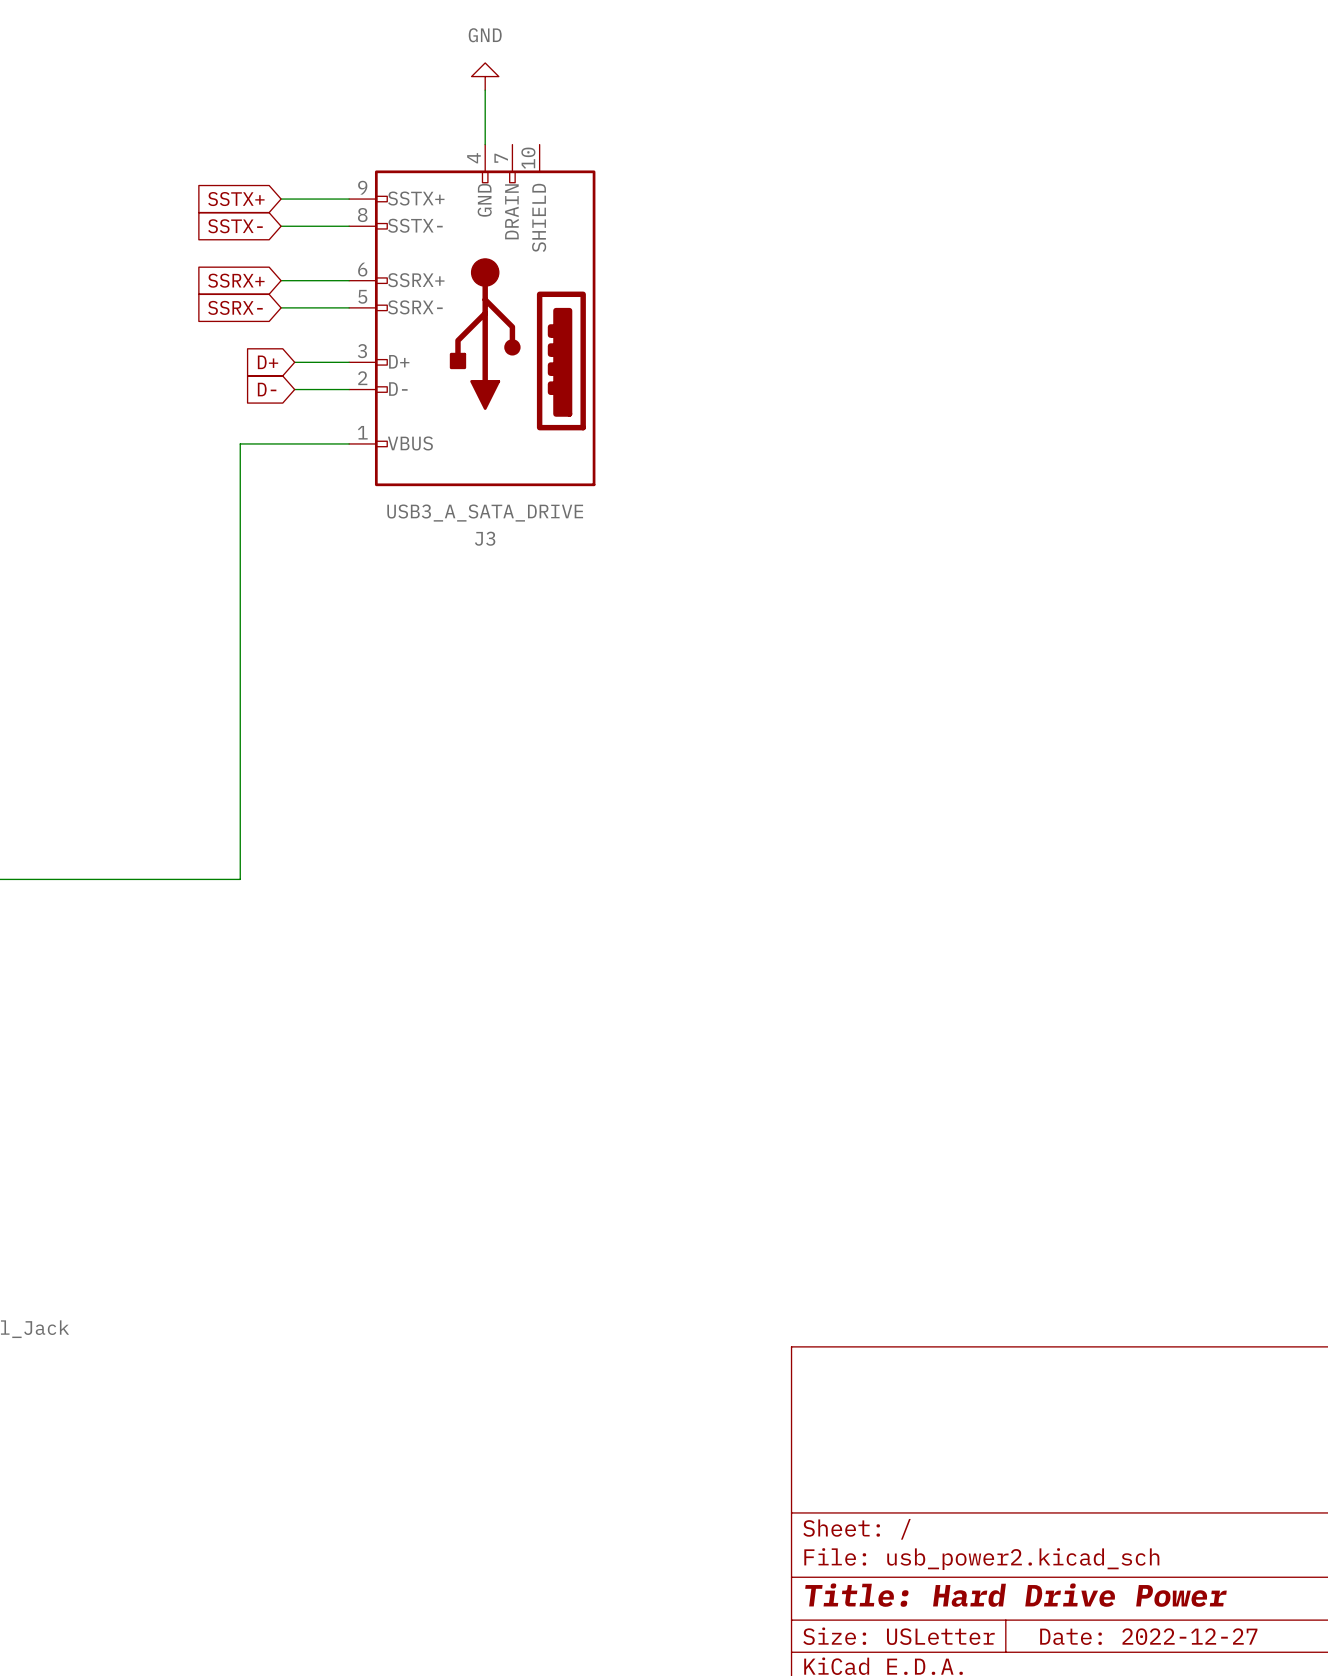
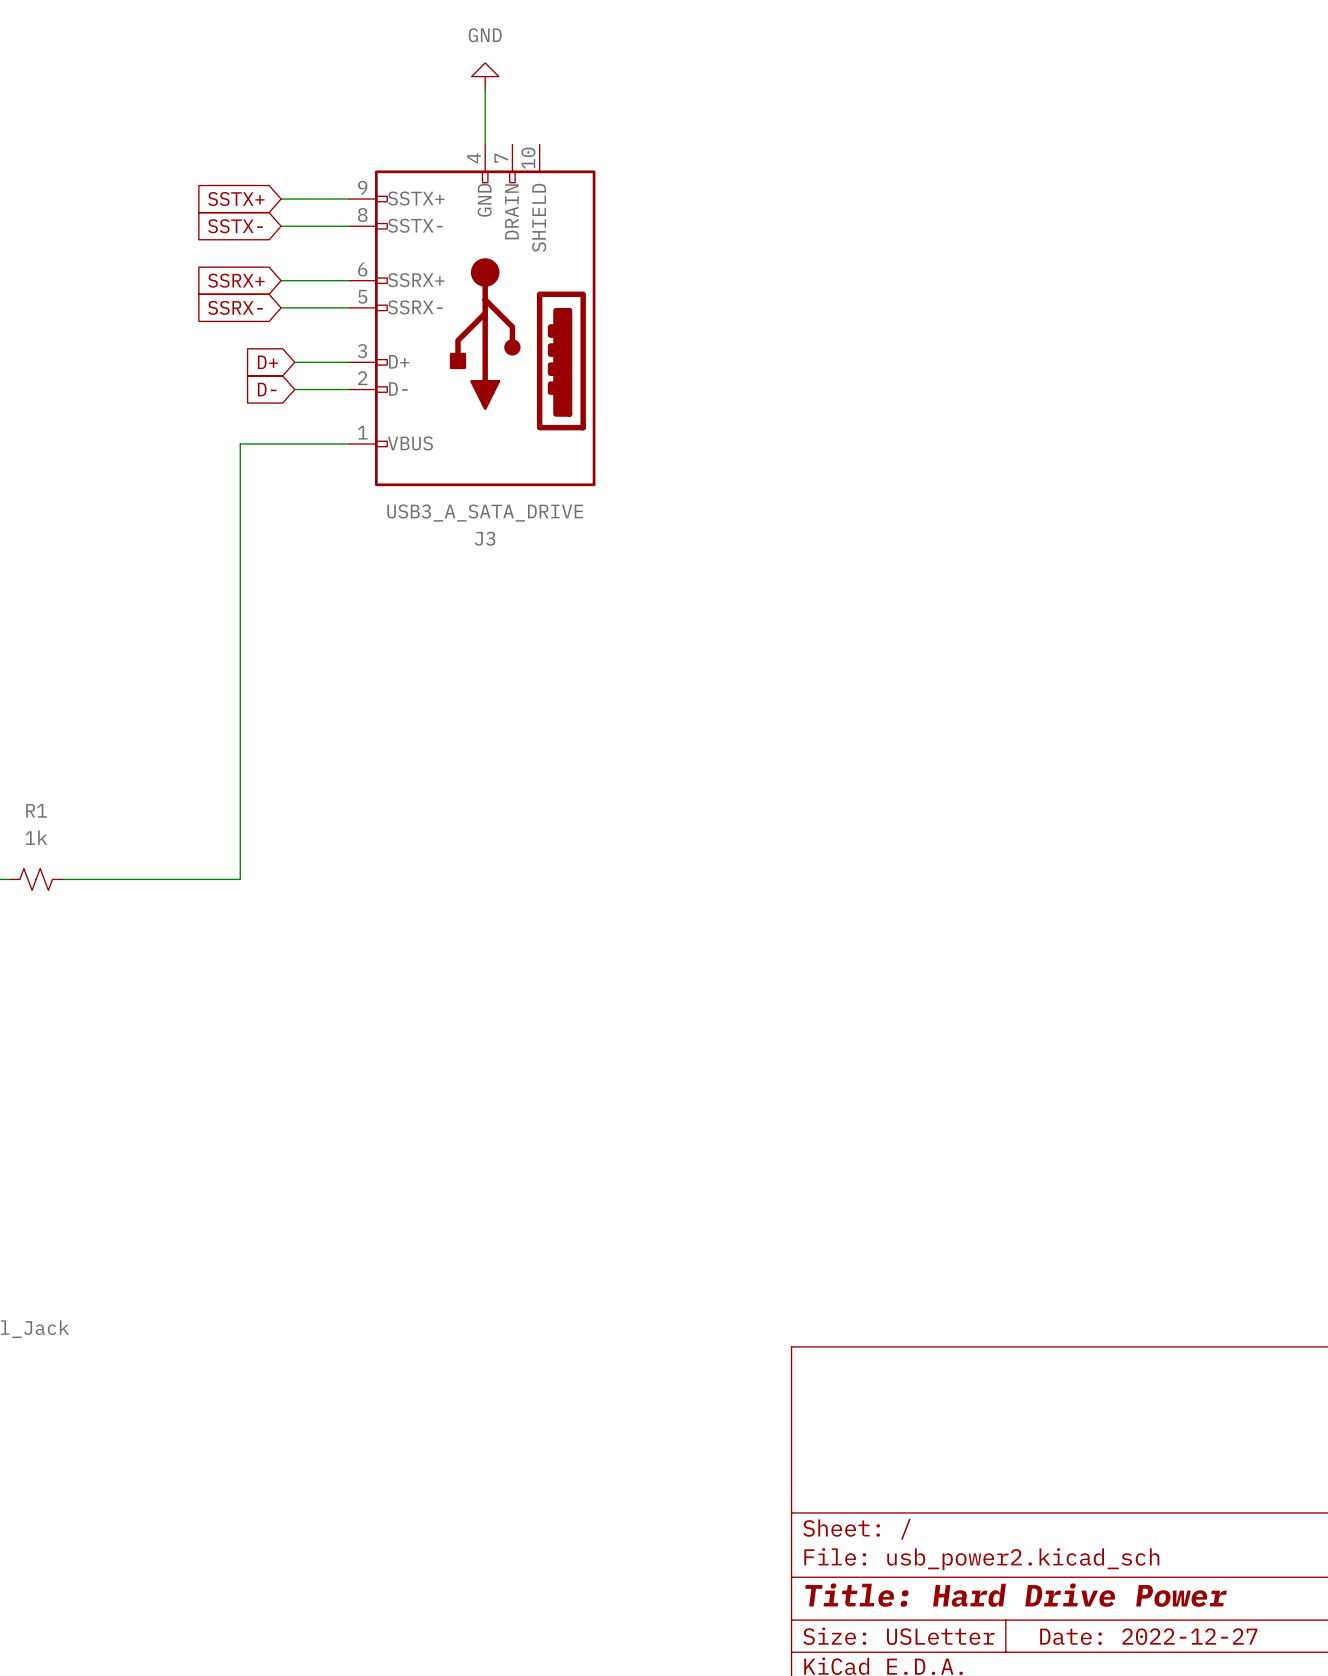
R1: none -> 1k (36, 879)

